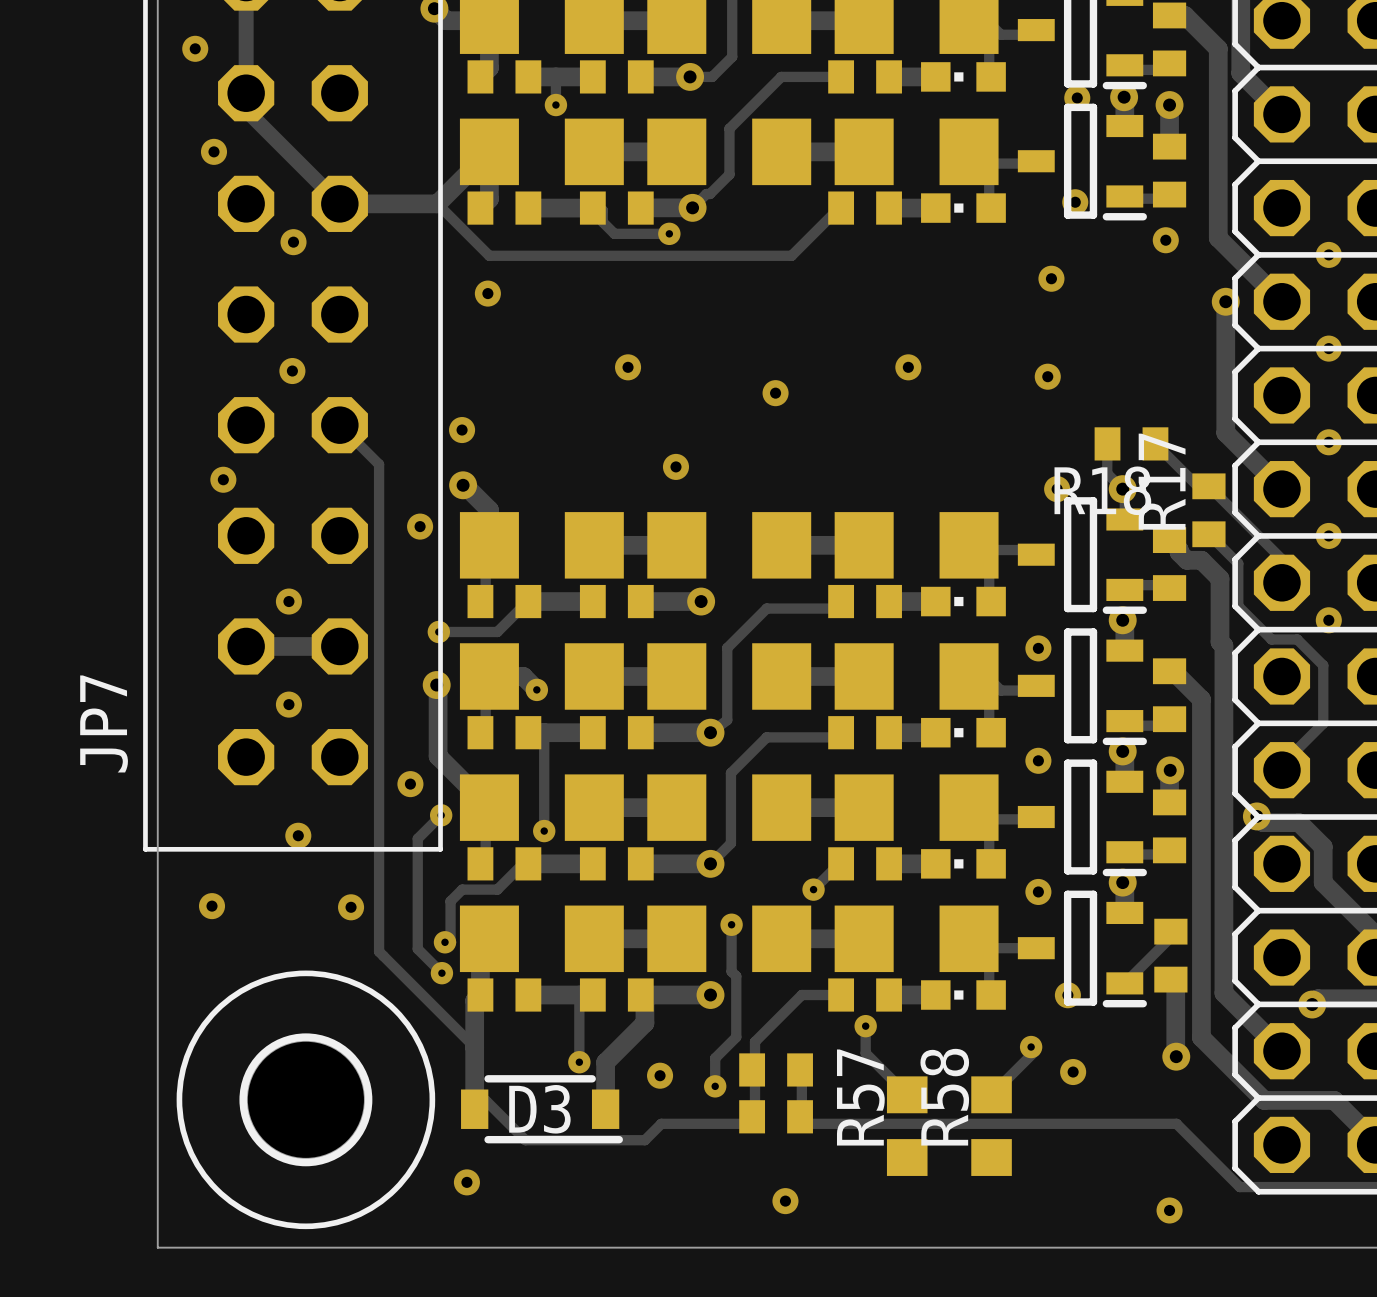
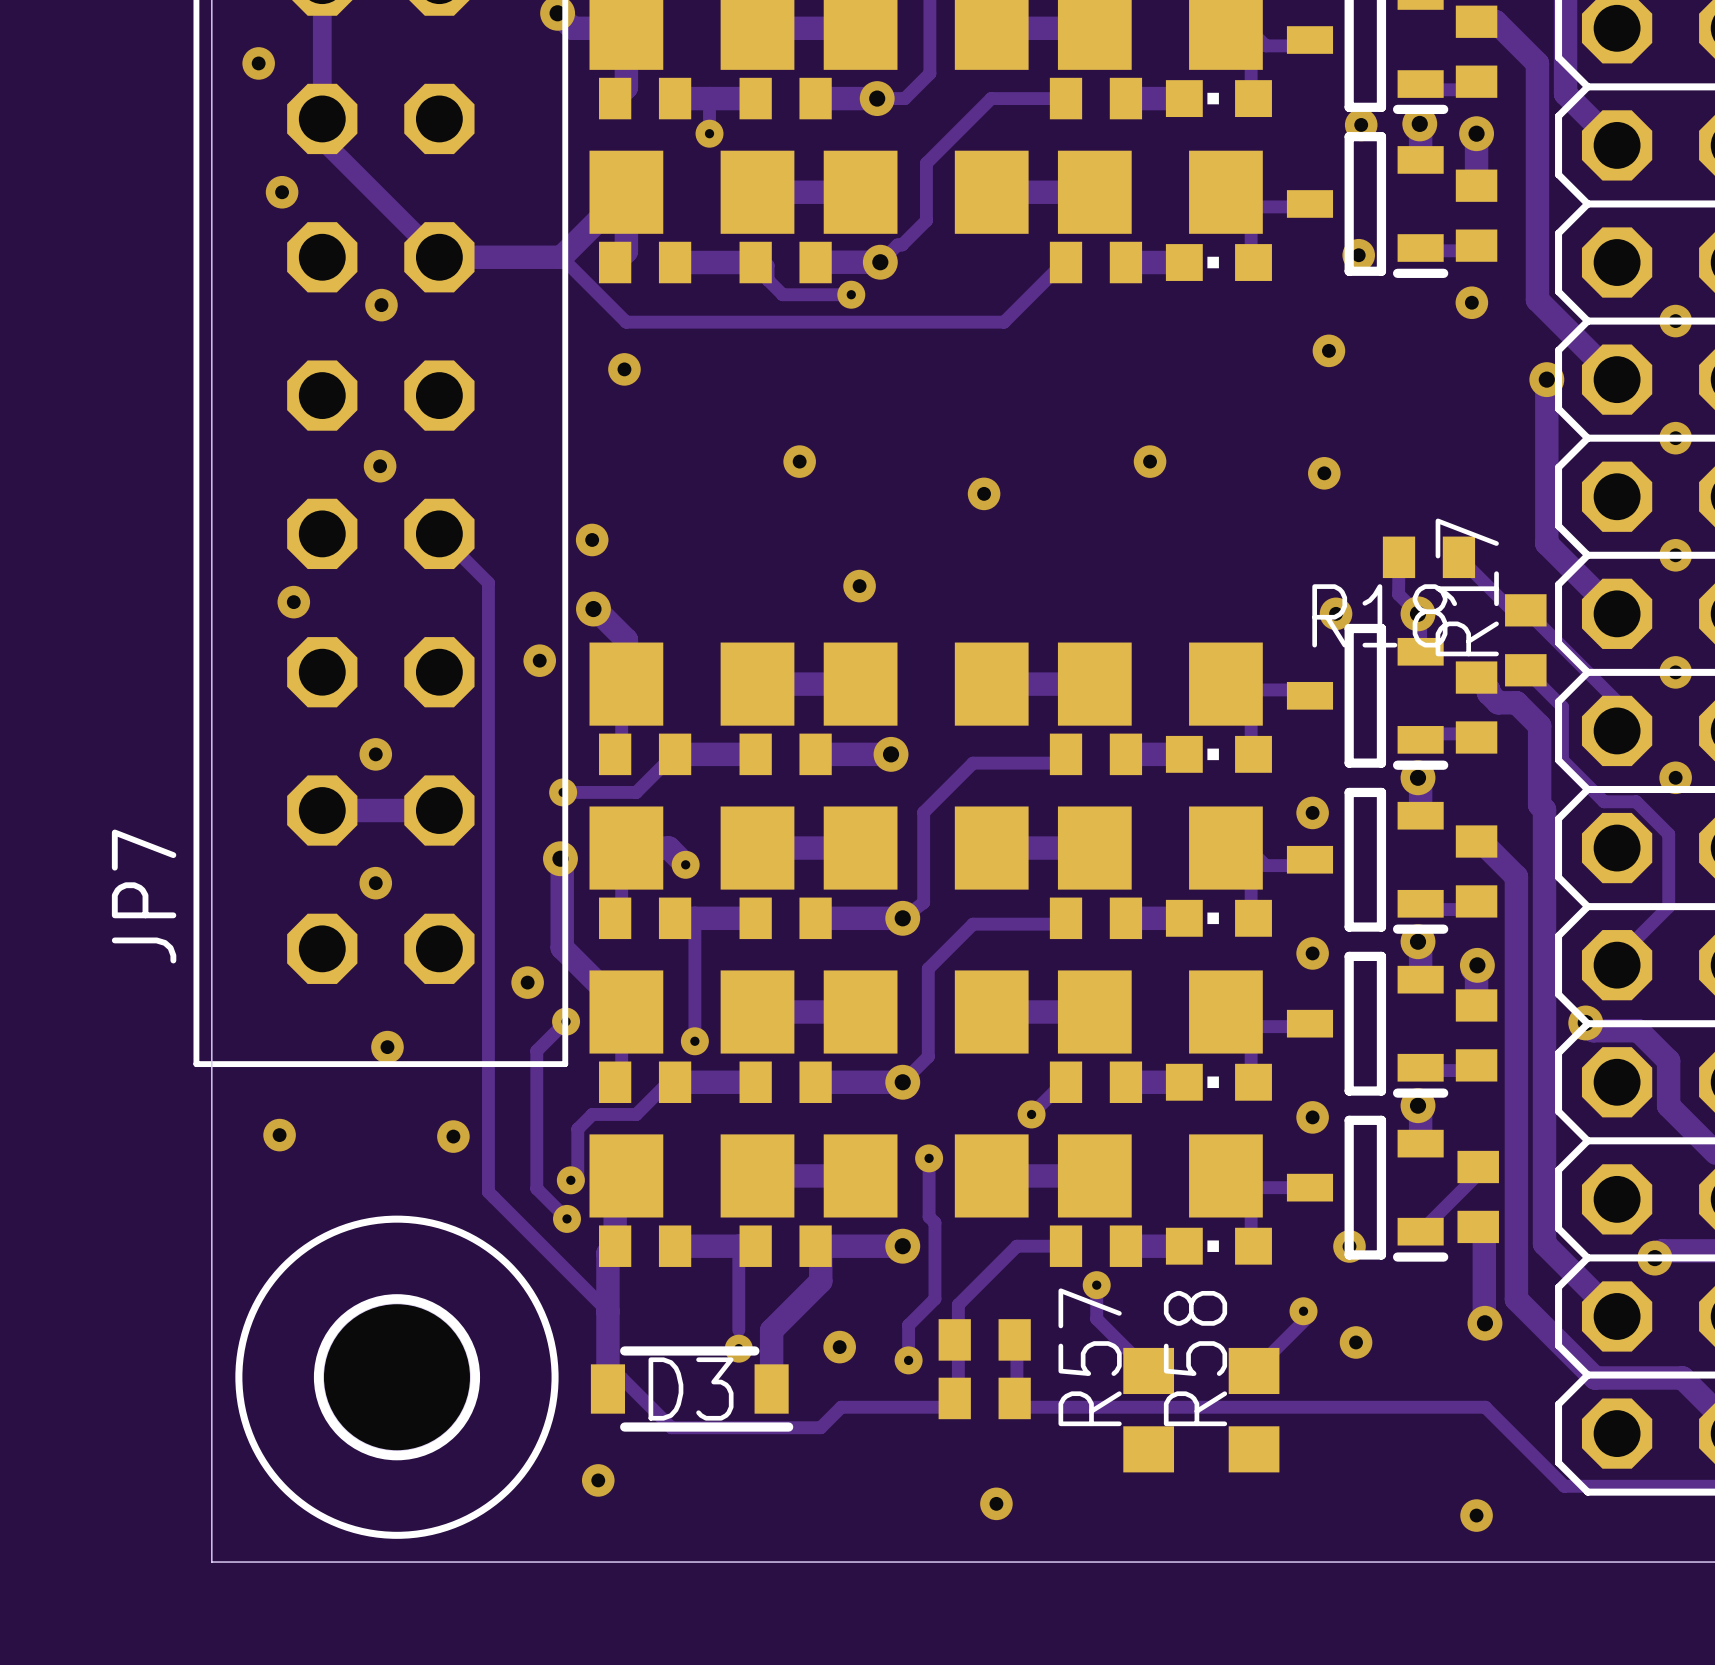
via position: (579, 1062) -> (738, 1348)

